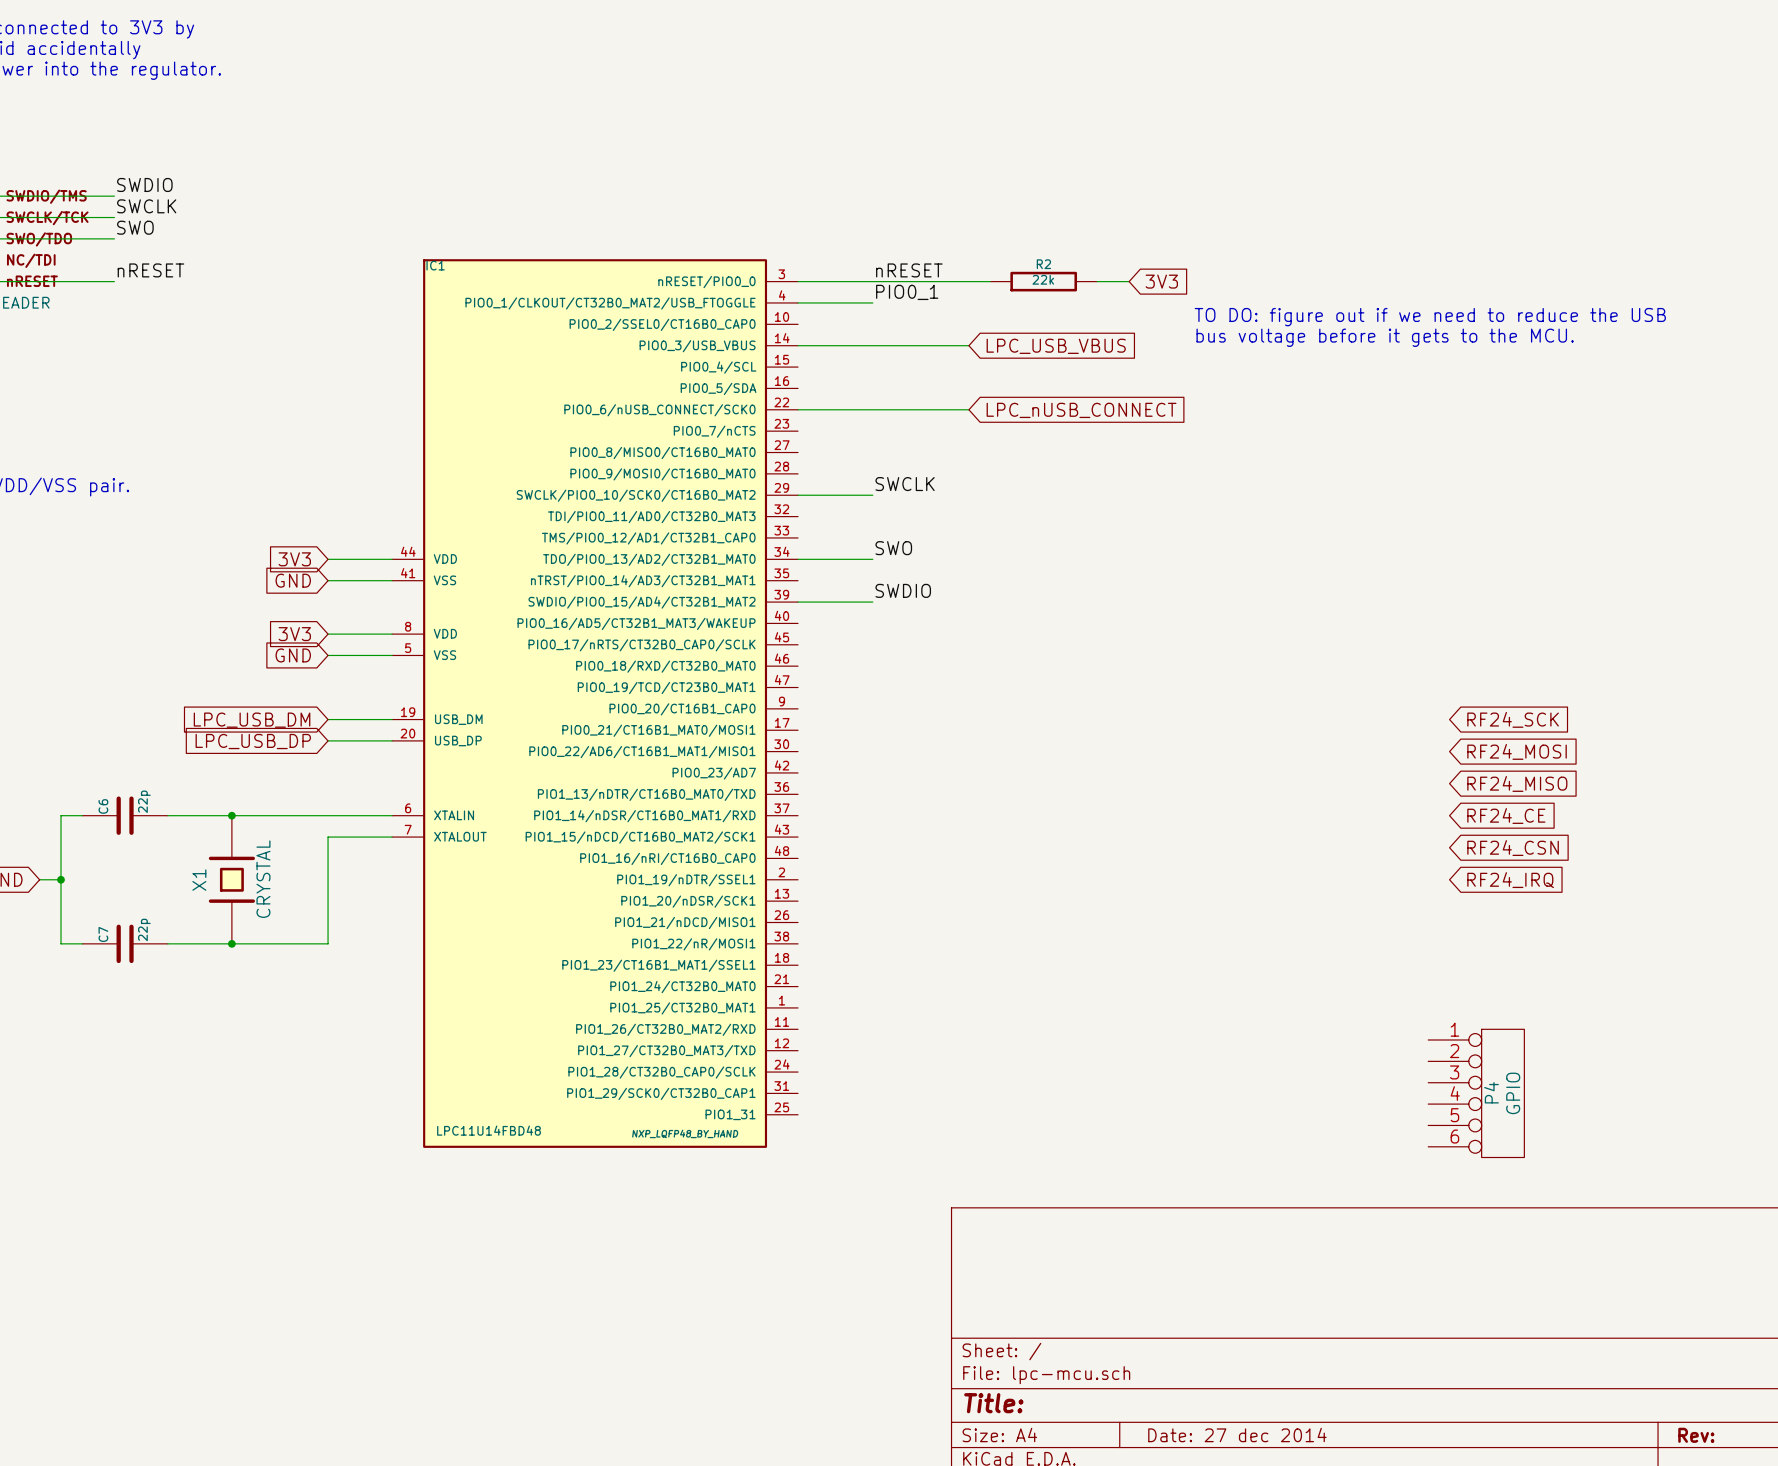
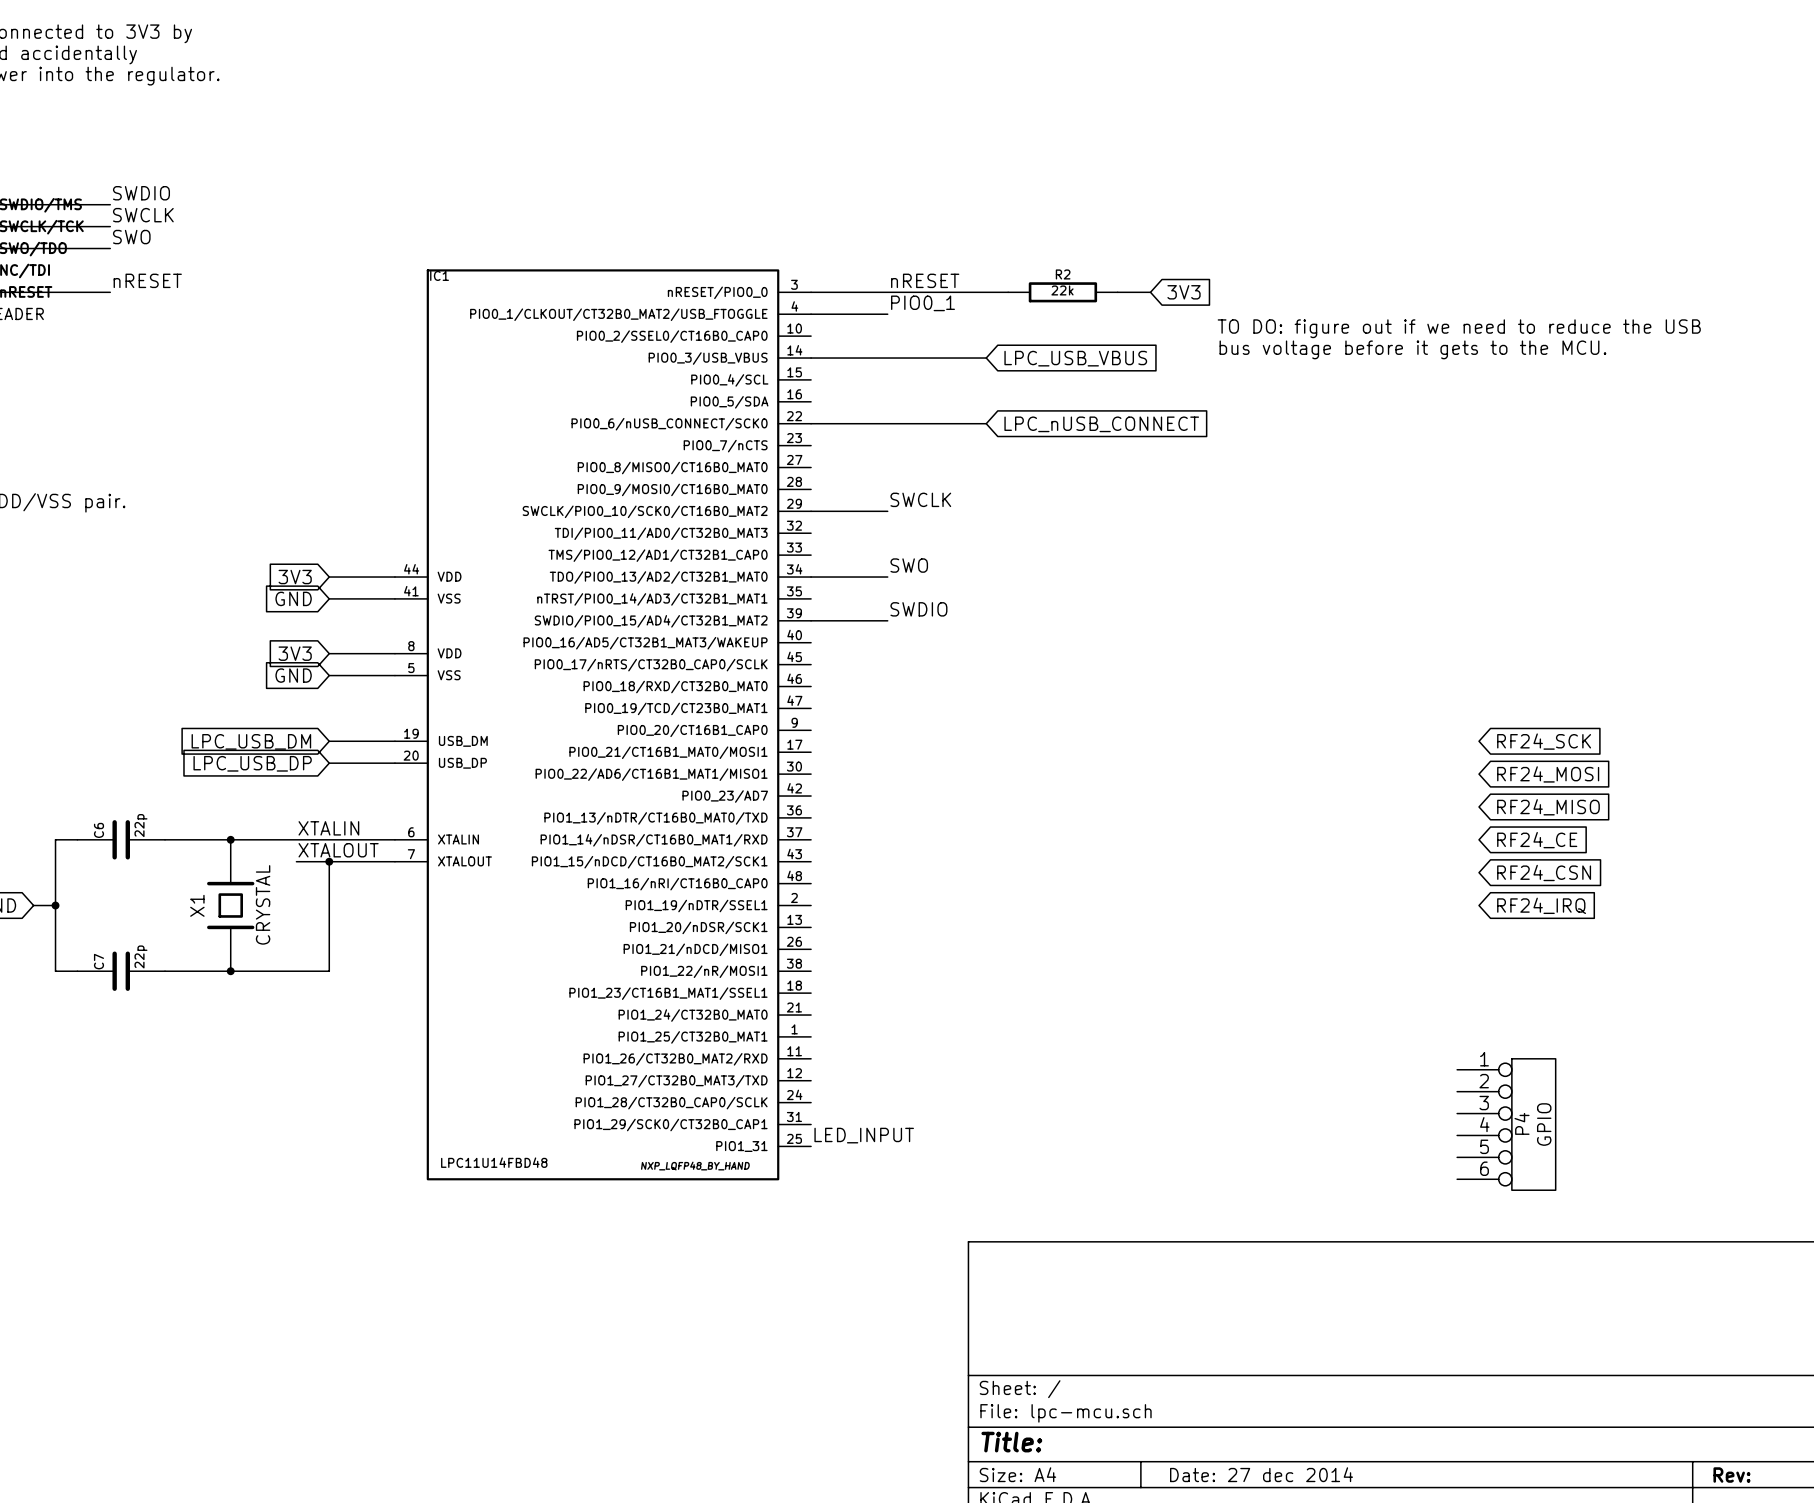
label: none -> XTALIN (328, 828)
label: none -> XTALOUT (338, 850)
wire: none -> (296, 861) (329, 861)
junction: none -> (329, 861)
label: none -> LED_INPUT (864, 1135)

